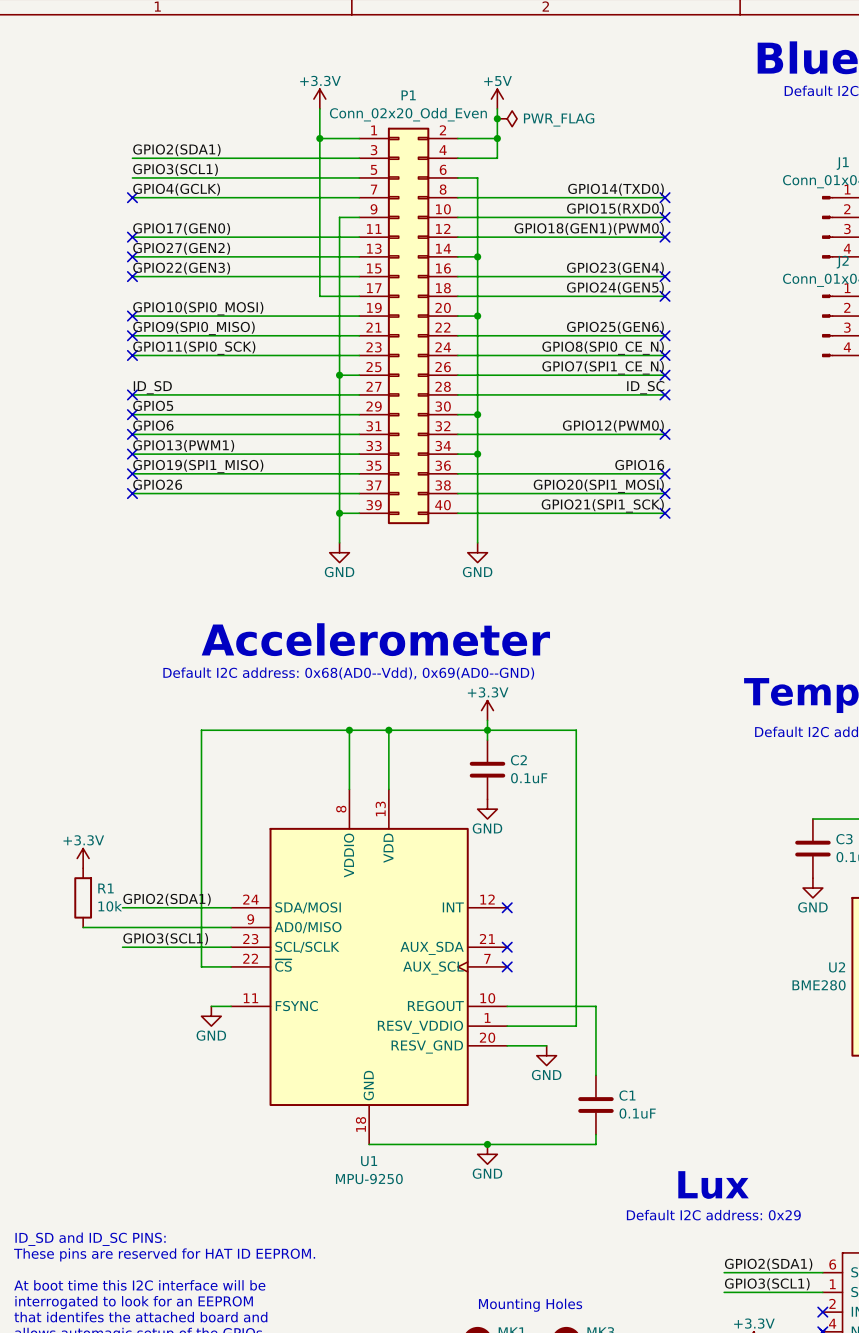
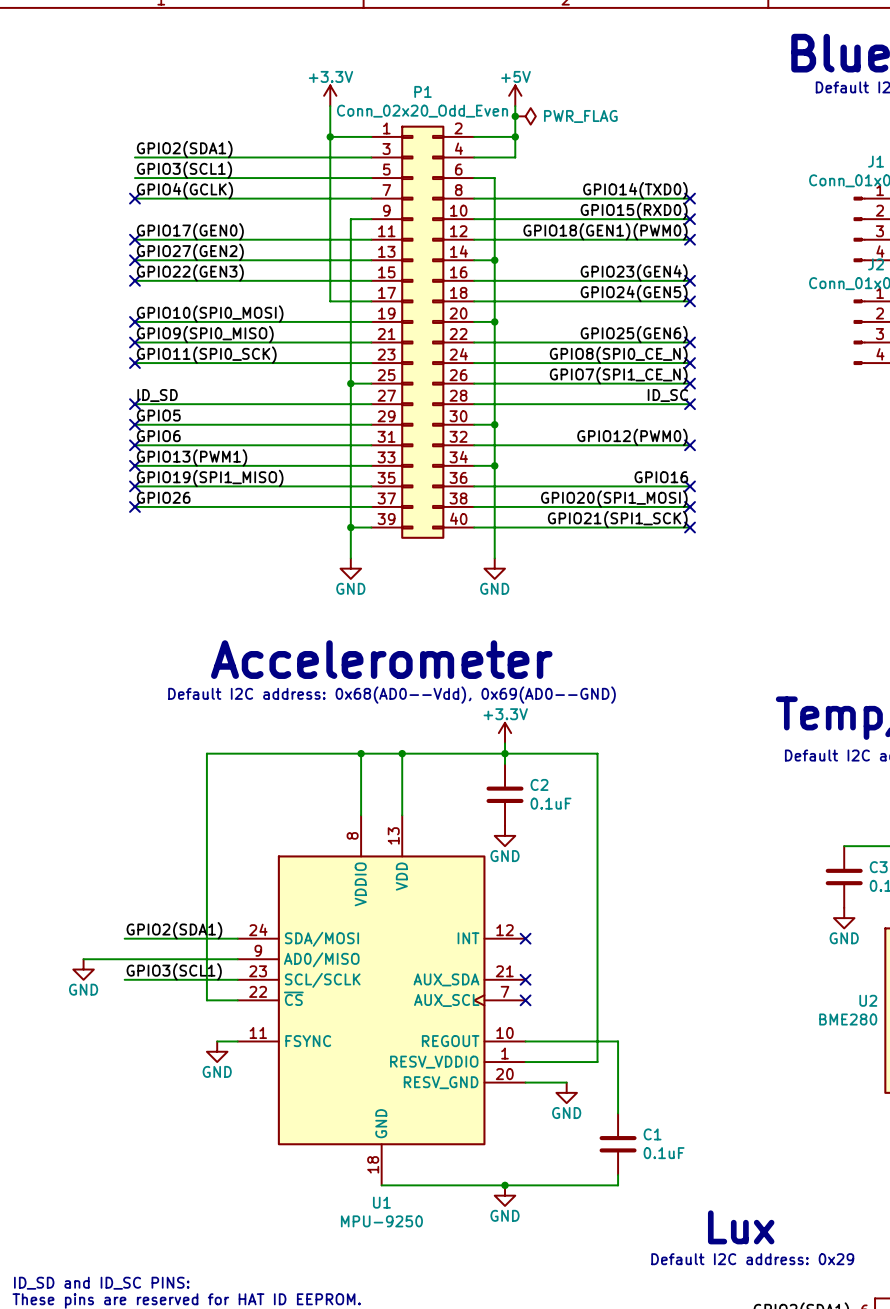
power symbol: +3.3V (83, 858) -> none
R1: 10k (83, 897) -> none
power symbol: none -> GND (83, 969)

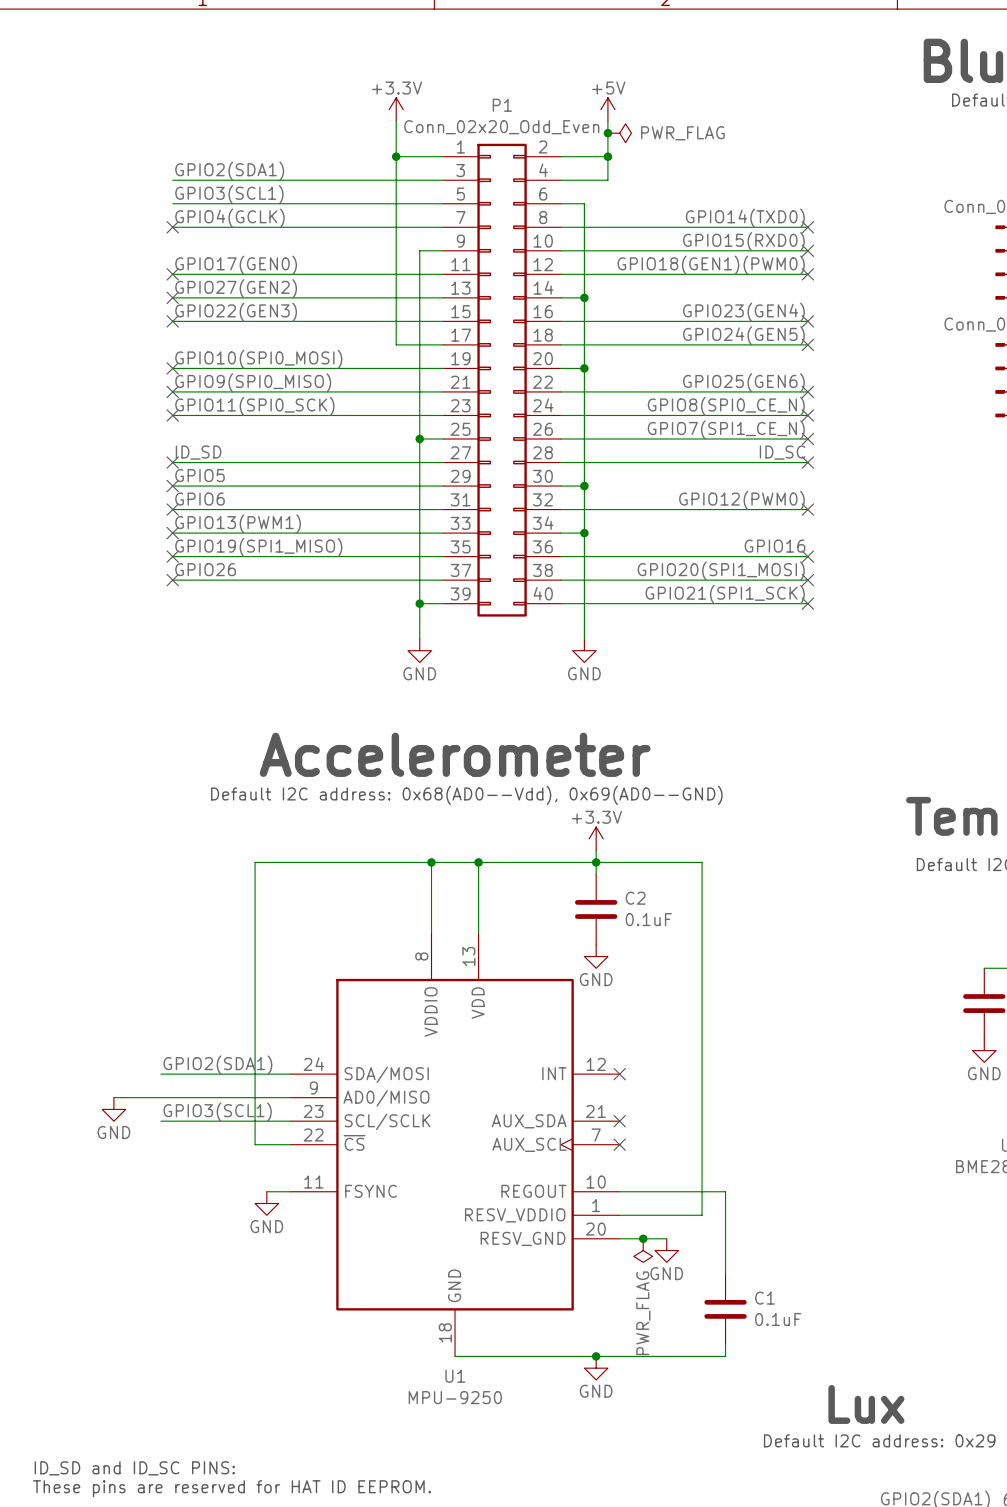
junction: none -> (643, 1238)
power symbol: none -> PWR_FLAG (643, 1250)

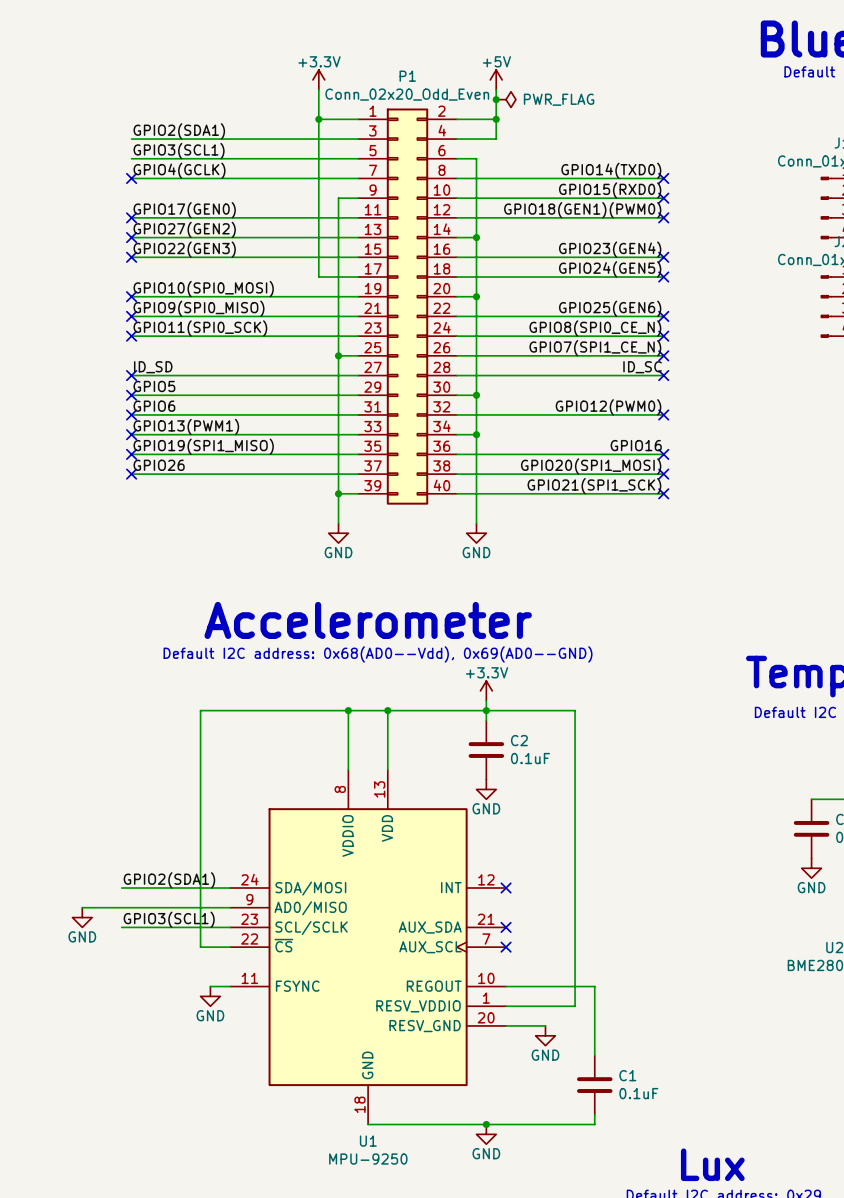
junction: (643, 1238) -> none
power symbol: PWR_FLAG (643, 1250) -> none

